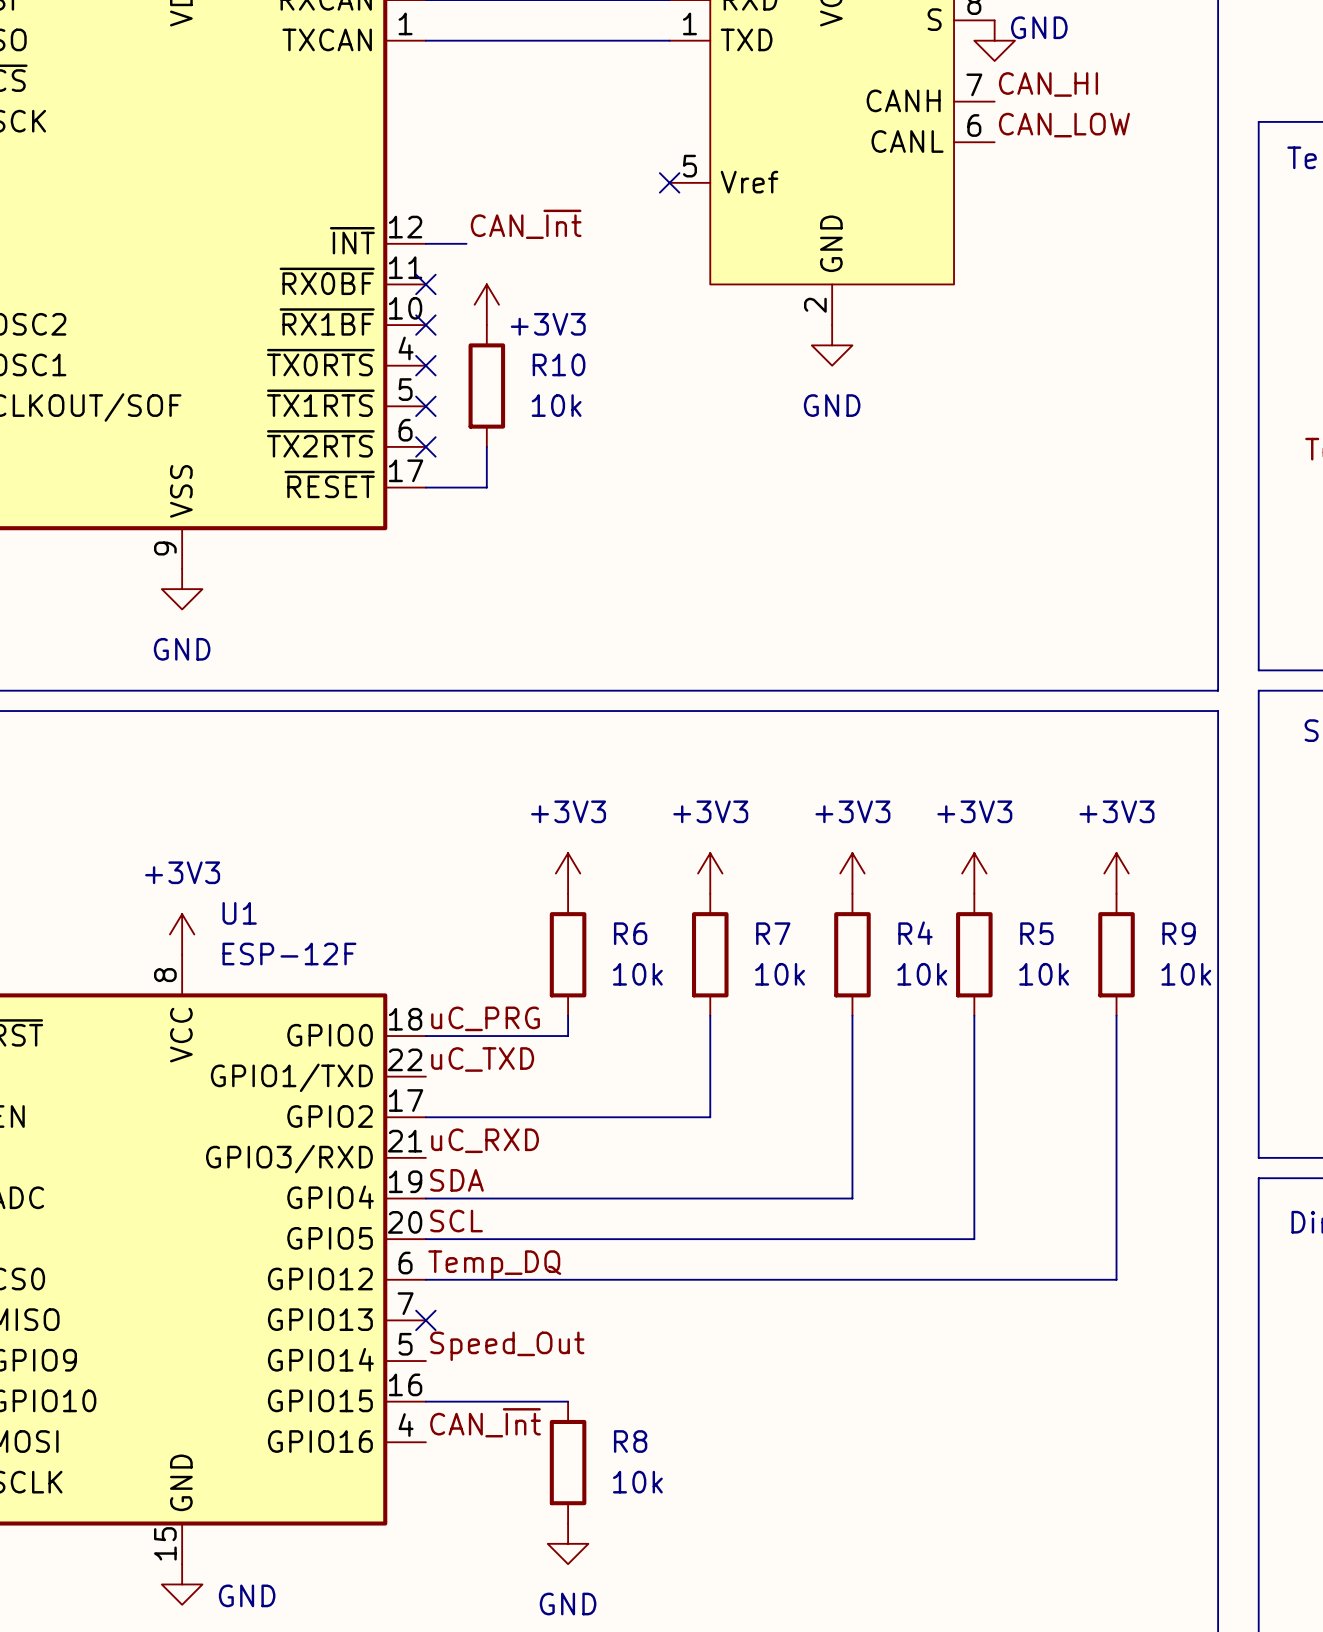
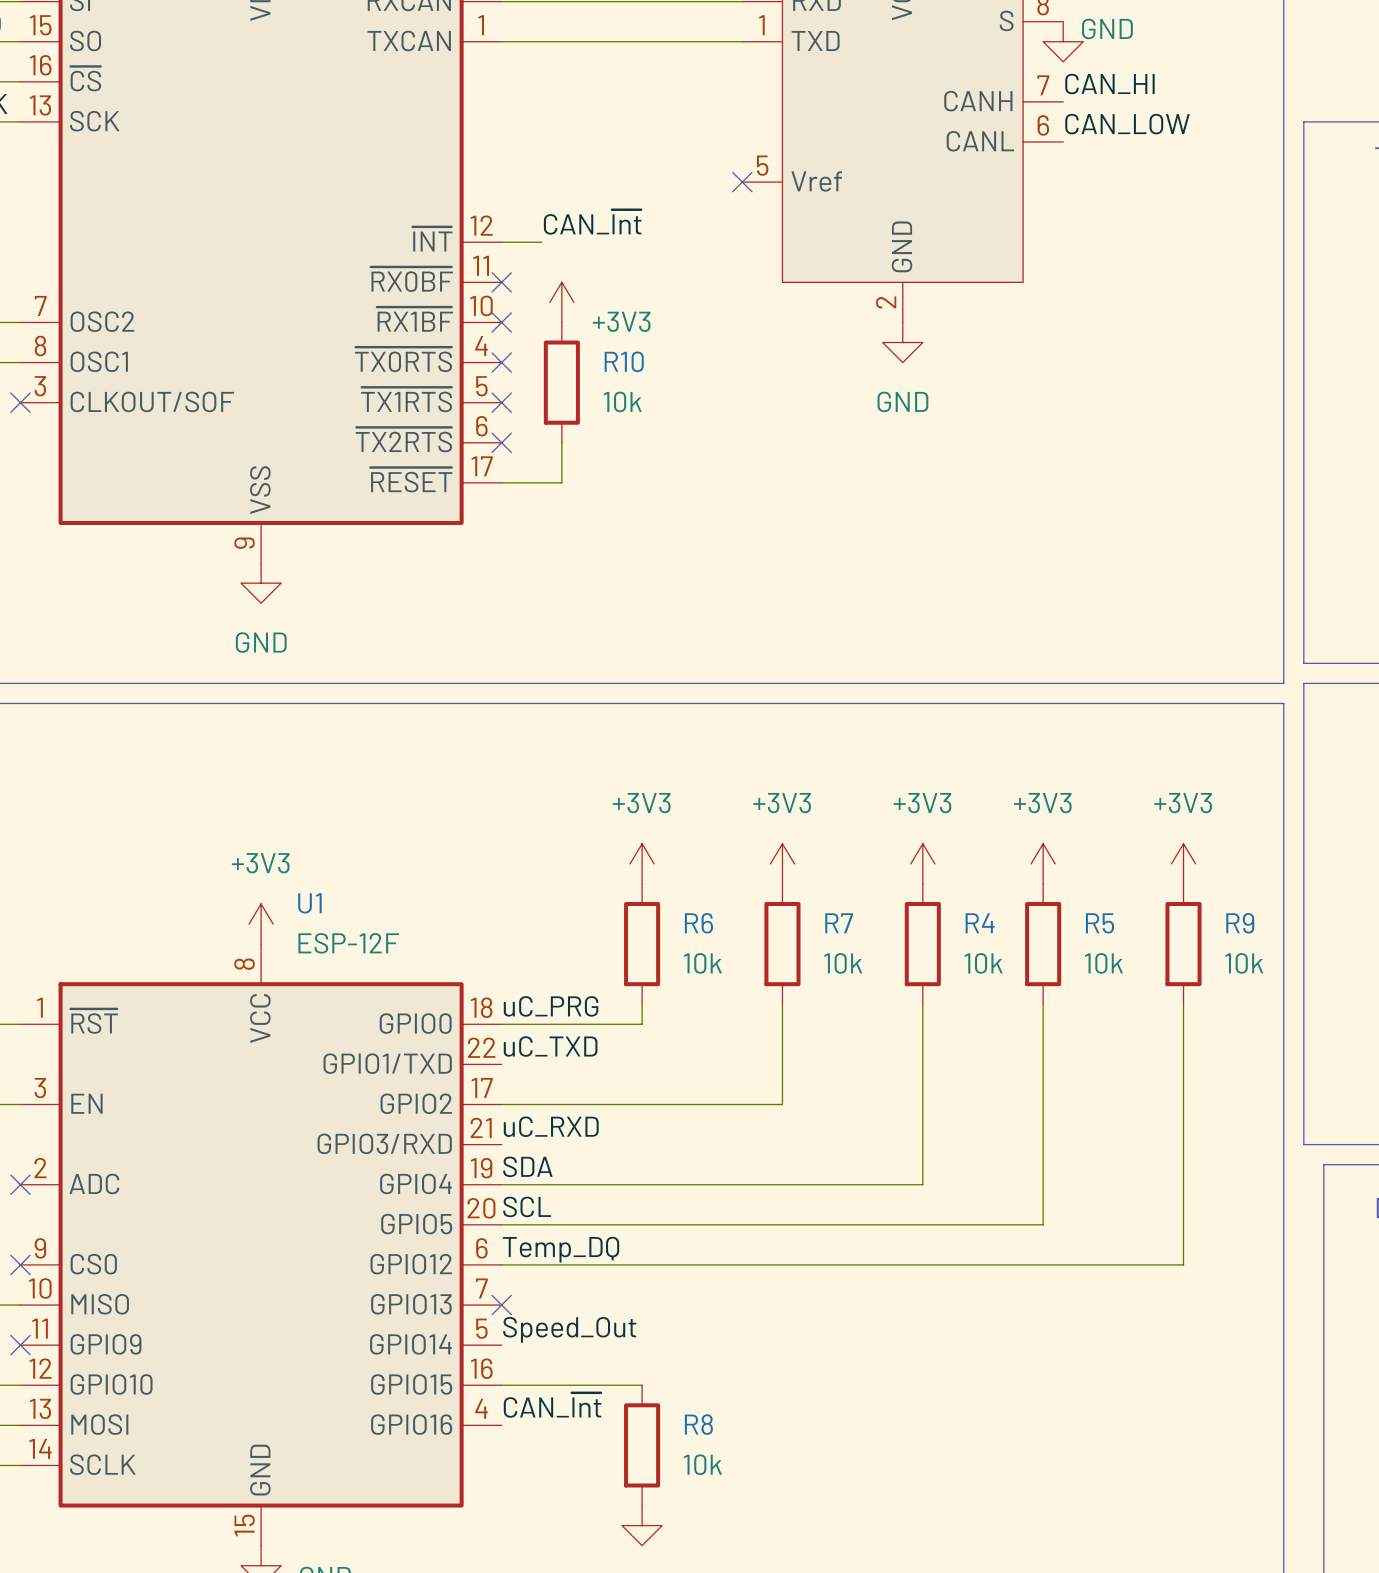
line: (1258, 121) (1258, 670) -> (1323, 121) (1303, 121) (1303, 663) (1323, 663)
line: (1258, 690) (1258, 1157) -> (1323, 683) (1303, 683) (1303, 1144) (1323, 1144)

